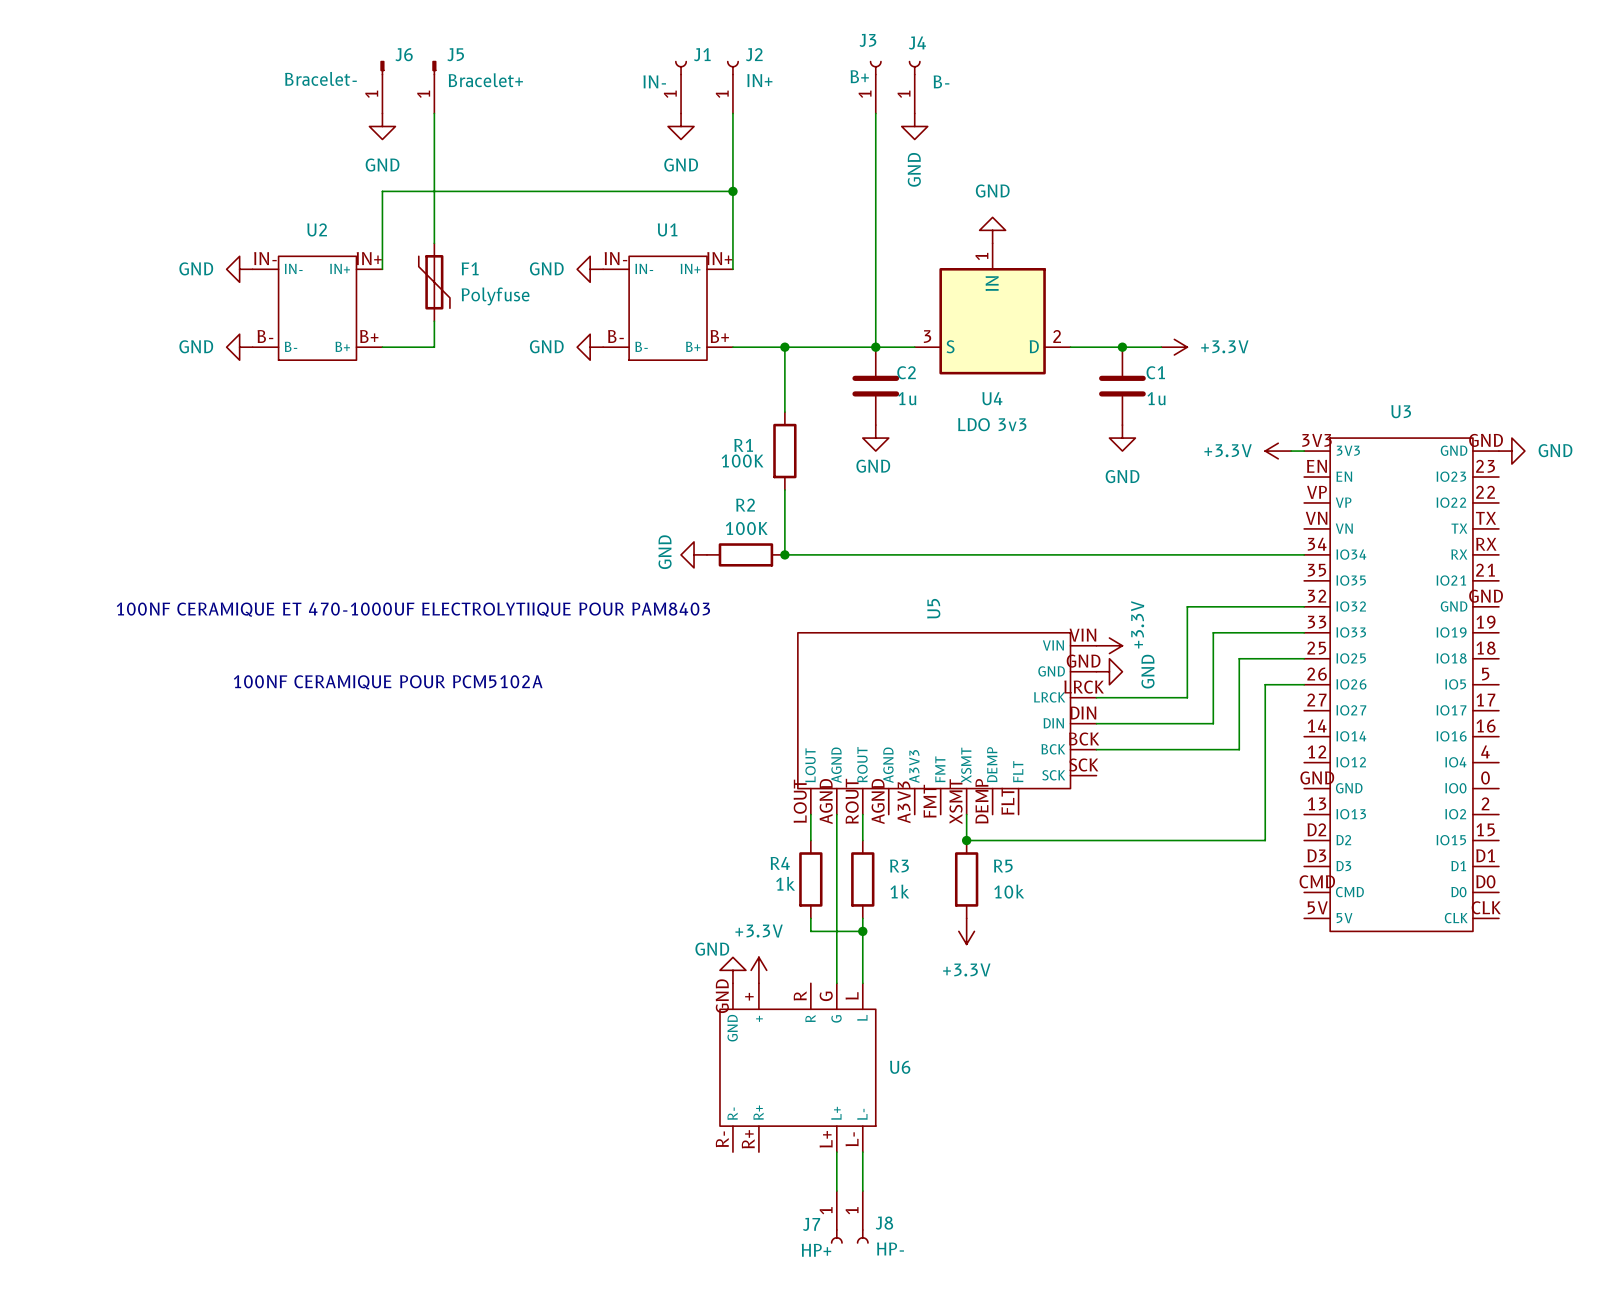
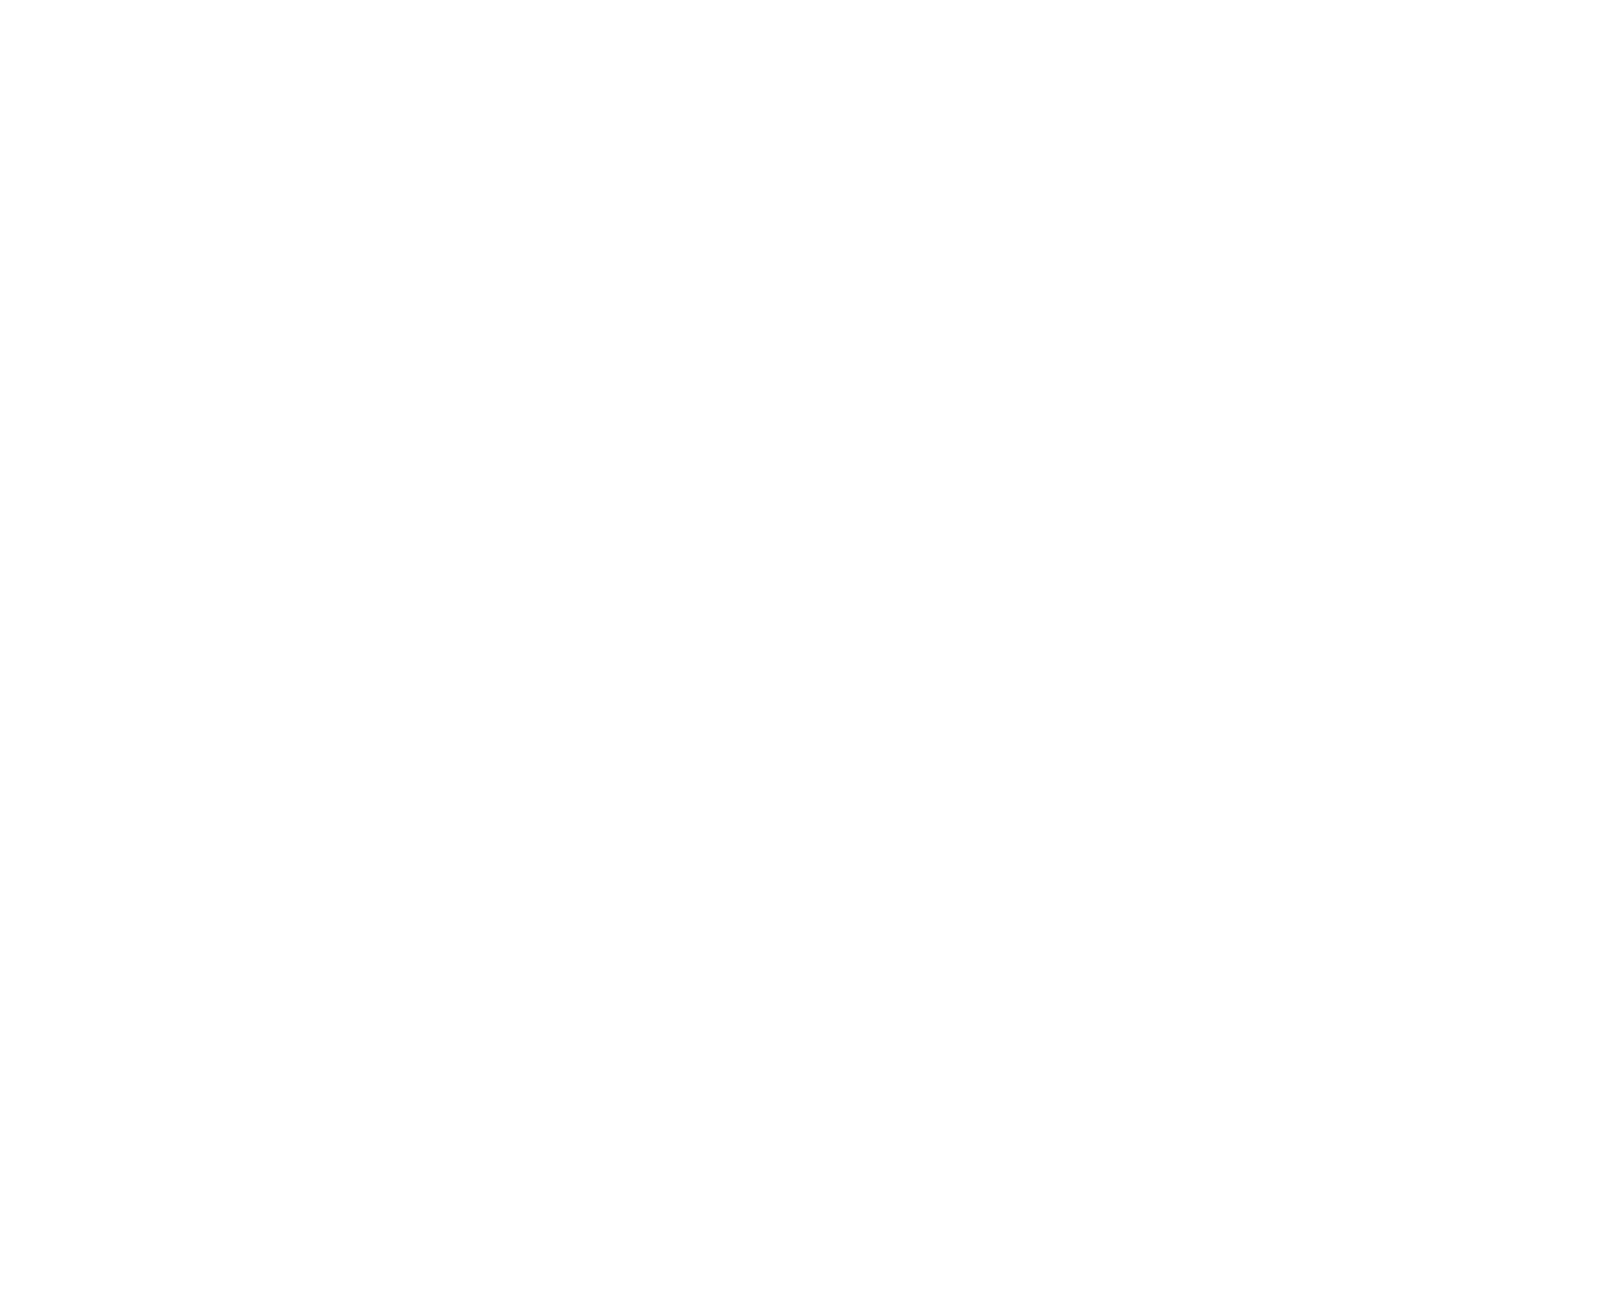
J6: Bracelet- (382, 87) -> none
J5: Bracelet+ (434, 87) -> none
J1: IN- (681, 87) -> none
J2: IN+ (732, 87) -> none
J3: B+ (875, 87) -> none
J4: B- (914, 87) -> none
wire: (434, 113) (434, 243) -> none
wire: (732, 113) (732, 269) -> none
wire: (875, 113) (875, 347) -> none
power symbol: GND (382, 126) -> none
power symbol: GND (681, 126) -> none
power symbol: GND (914, 126) -> none
wire: (732, 191) (382, 191) (382, 269) -> none
junction: (732, 191) -> none
power symbol: GND (992, 230) -> none
power symbol: GND (239, 269) -> none
power symbol: GND (590, 269) -> none
F1: Polyfuse (434, 282) -> none
U2: (317, 308) -> none
U1: (668, 308) -> none
U4: LDO 3v3 (992, 308) -> none
wire: (434, 321) (434, 347) (382, 347) -> none
power symbol: GND (239, 347) -> none
power symbol: GND (590, 347) -> none
wire: (732, 347) (914, 347) -> none
wire: (784, 347) (784, 412) -> none
junction: (784, 347) -> none
junction: (875, 347) -> none
wire: (1070, 347) (1161, 347) -> none
junction: (1122, 347) -> none
power symbol: +3.3V (1174, 347) -> none
C2: 1u (875, 386) -> none
C1: 1u (1122, 386) -> none
power symbol: GND (875, 438) -> none
power symbol: GND (1122, 438) -> none
R1: 100K (784, 451) -> none
power symbol: +3.3V (1278, 451) -> none
wire: (1291, 451) (1304, 451) -> none
power symbol: GND (1511, 451) -> none
wire: (784, 489) (784, 554) (1304, 554) -> none
power symbol: GND (694, 554) -> none
R2: 100K (745, 554) -> none
junction: (784, 554) -> none
wire: (1304, 606) (1187, 606) (1187, 697) (1096, 697) -> none
text: 100NF CERAMIQUE ET 470-1000UF ELECTROLYTIIQUE POUR PAM8403 (413, 609) -> none
wire: (1304, 632) (1213, 632) (1213, 723) (1096, 723) -> none
power symbol: +3.3V (1109, 645) -> none
wire: (1304, 658) (1239, 658) (1239, 749) (1096, 749) -> none
power symbol: GND (1109, 671) -> none
text: 100NF CERAMIQUE POUR PCM5102A (388, 682) -> none
wire: (1304, 684) (1265, 684) (1265, 840) (966, 840) (966, 814) -> none
U3: (1401, 684) -> none
U5: (947, 723) -> none
wire: (810, 814) (810, 840) -> none
wire: (836, 814) (836, 983) -> none
wire: (862, 814) (862, 840) -> none
junction: (966, 840) -> none
R4: 1k (810, 879) -> none
R3: 1k (862, 879) -> none
R5: 10k (966, 879) -> none
wire: (810, 918) (810, 931) (862, 931) -> none
wire: (862, 918) (862, 983) -> none
junction: (862, 931) -> none
power symbol: +3.3V (966, 931) -> none
power symbol: GND (732, 970) -> none
power symbol: +3.3V (758, 970) -> none
U6: (797, 1067) -> none
wire: (836, 1152) (836, 1191) -> none
wire: (862, 1152) (862, 1191) -> none
J7: HP+ (836, 1217) -> none
J8: HP- (862, 1217) -> none

